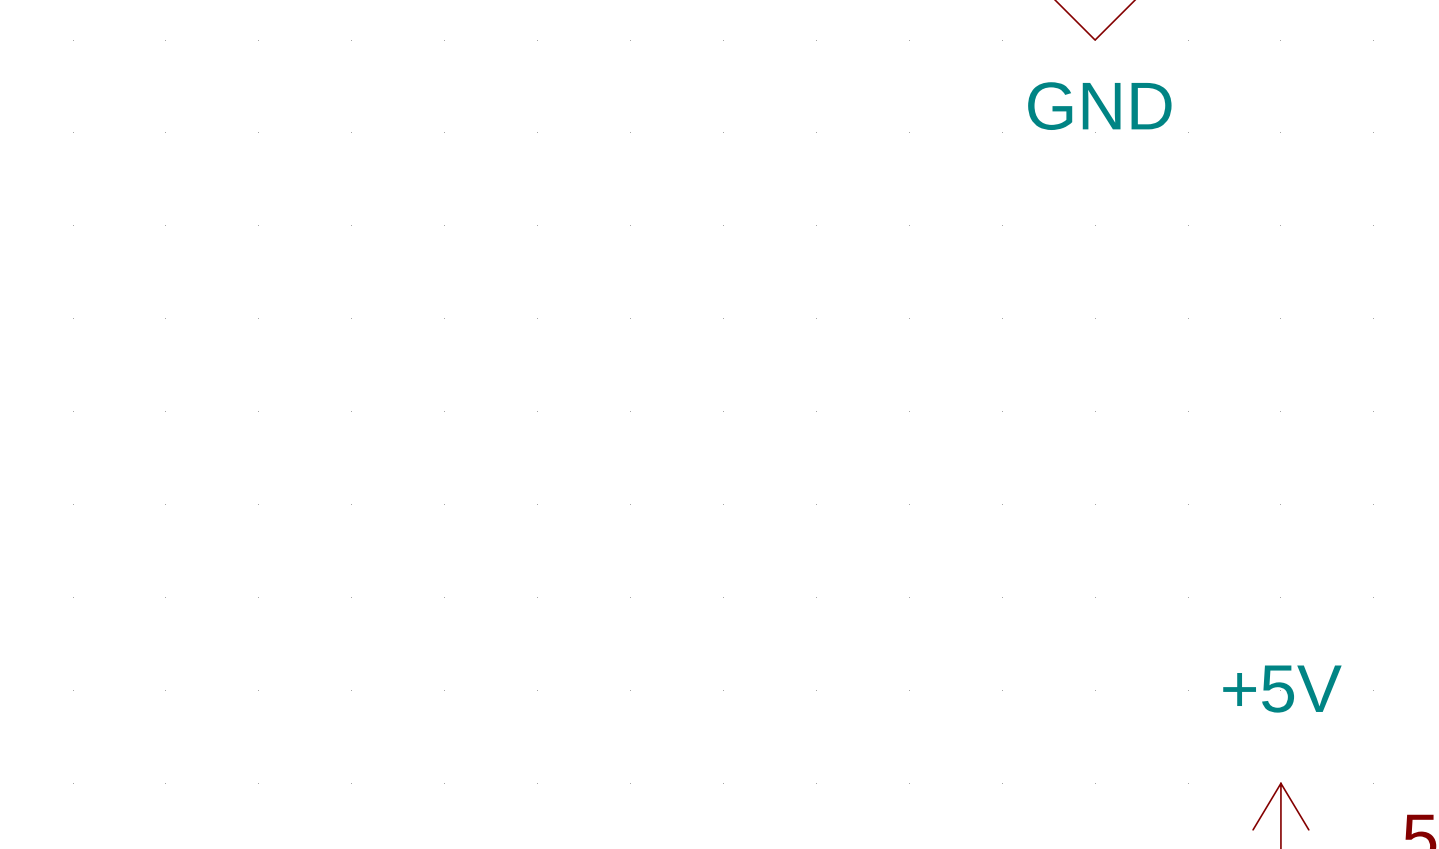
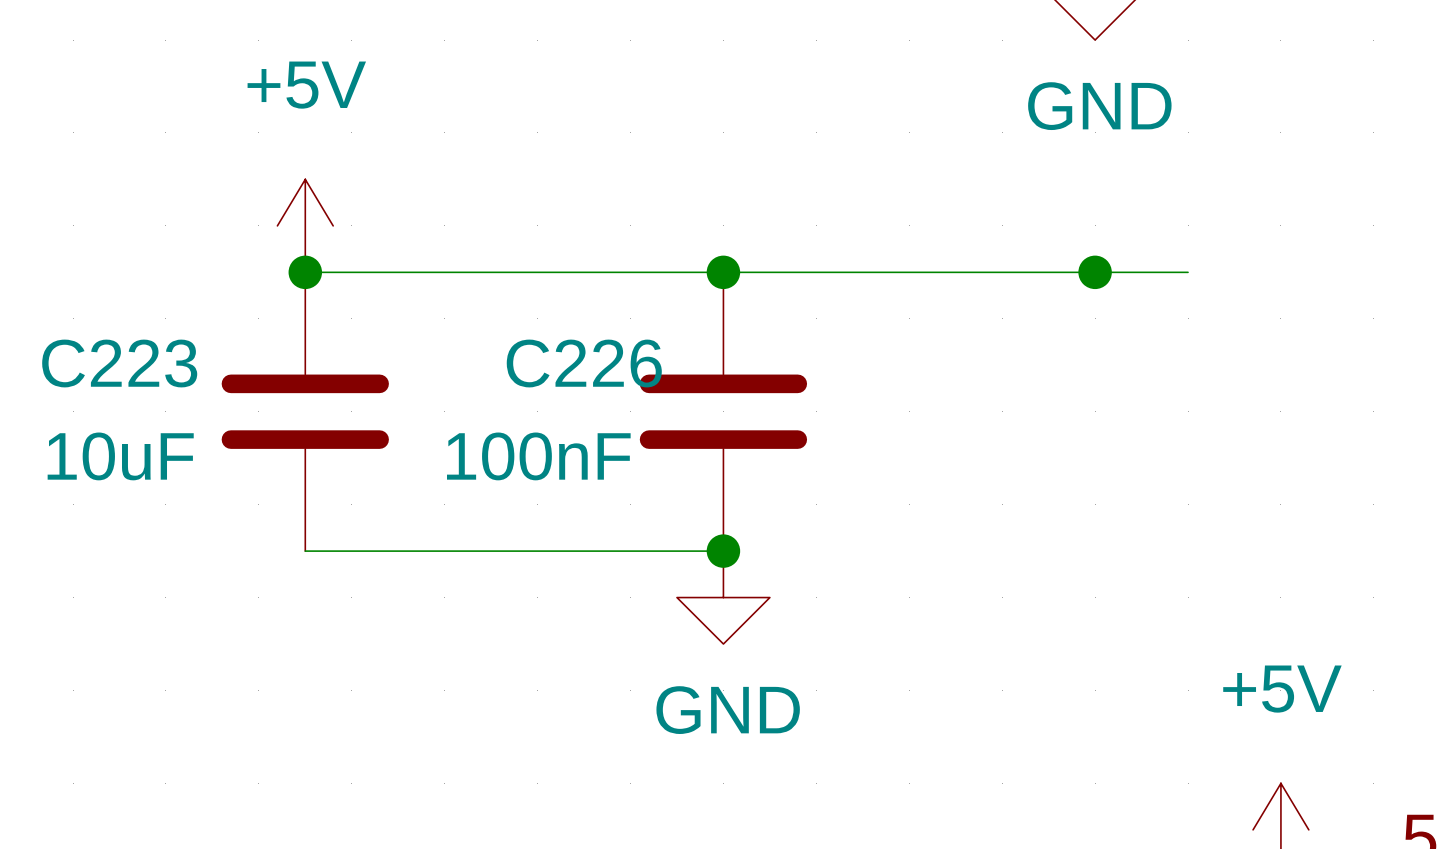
power symbol: none -> +5V (305, 225)
wire: none -> (305, 272) (1188, 272)
junction: none -> (305, 272)
junction: none -> (723, 272)
junction: none -> (1095, 272)
C223: none -> 10uF (305, 411)
C226: none -> 100nF (723, 411)
wire: none -> (305, 551) (723, 551)
junction: none -> (723, 551)
power symbol: none -> GND (723, 597)

